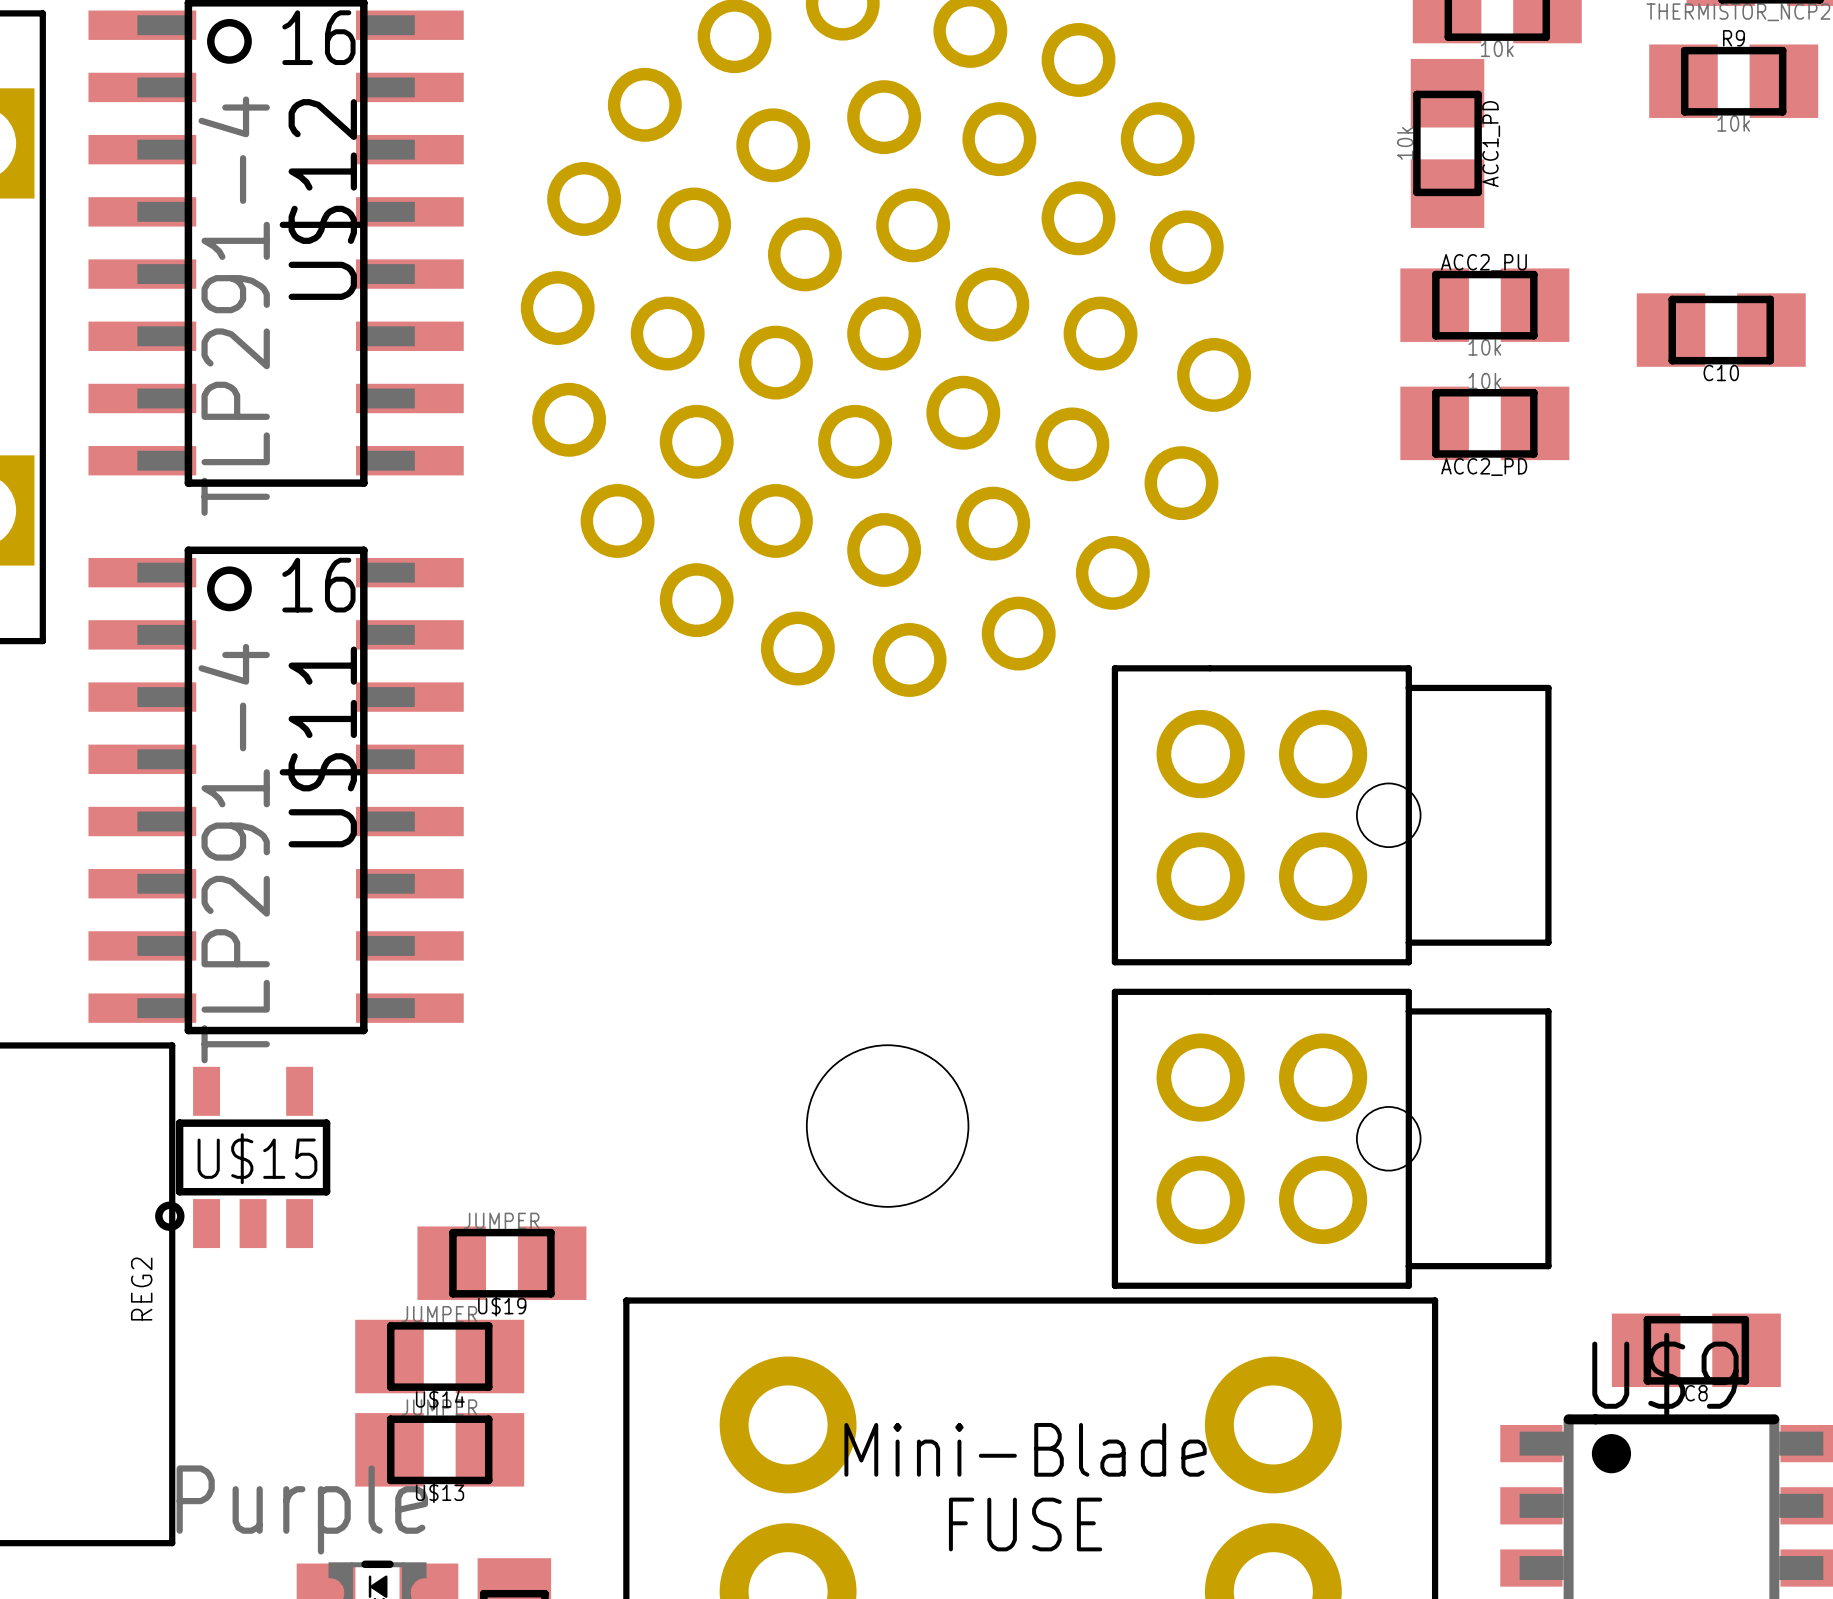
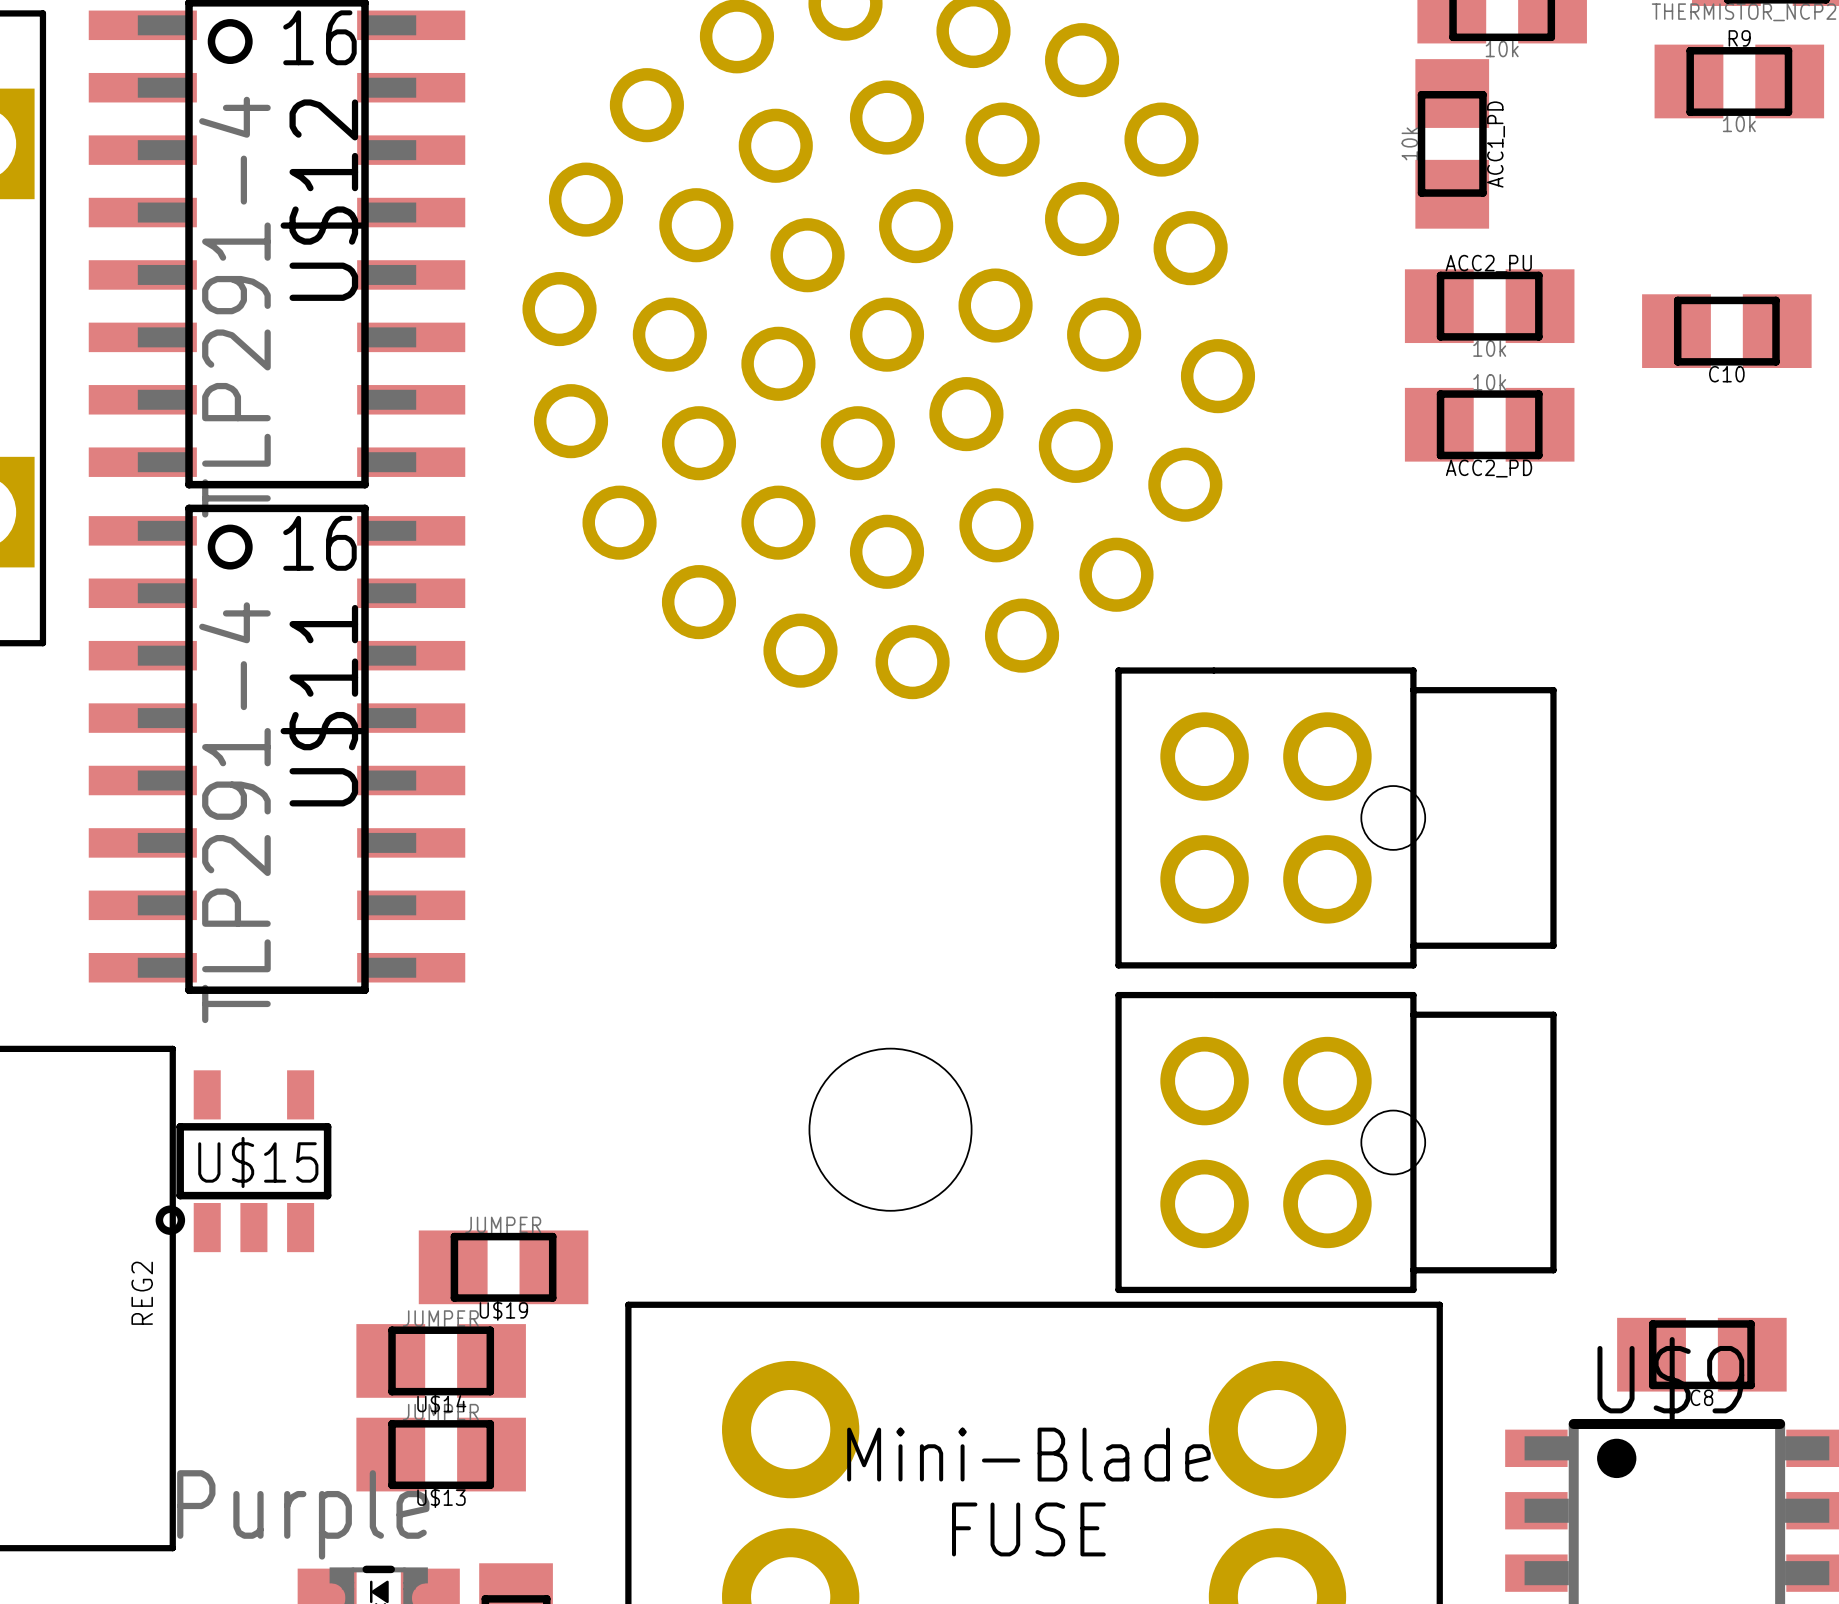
U$11 position: (276, 790) -> (277, 749)

